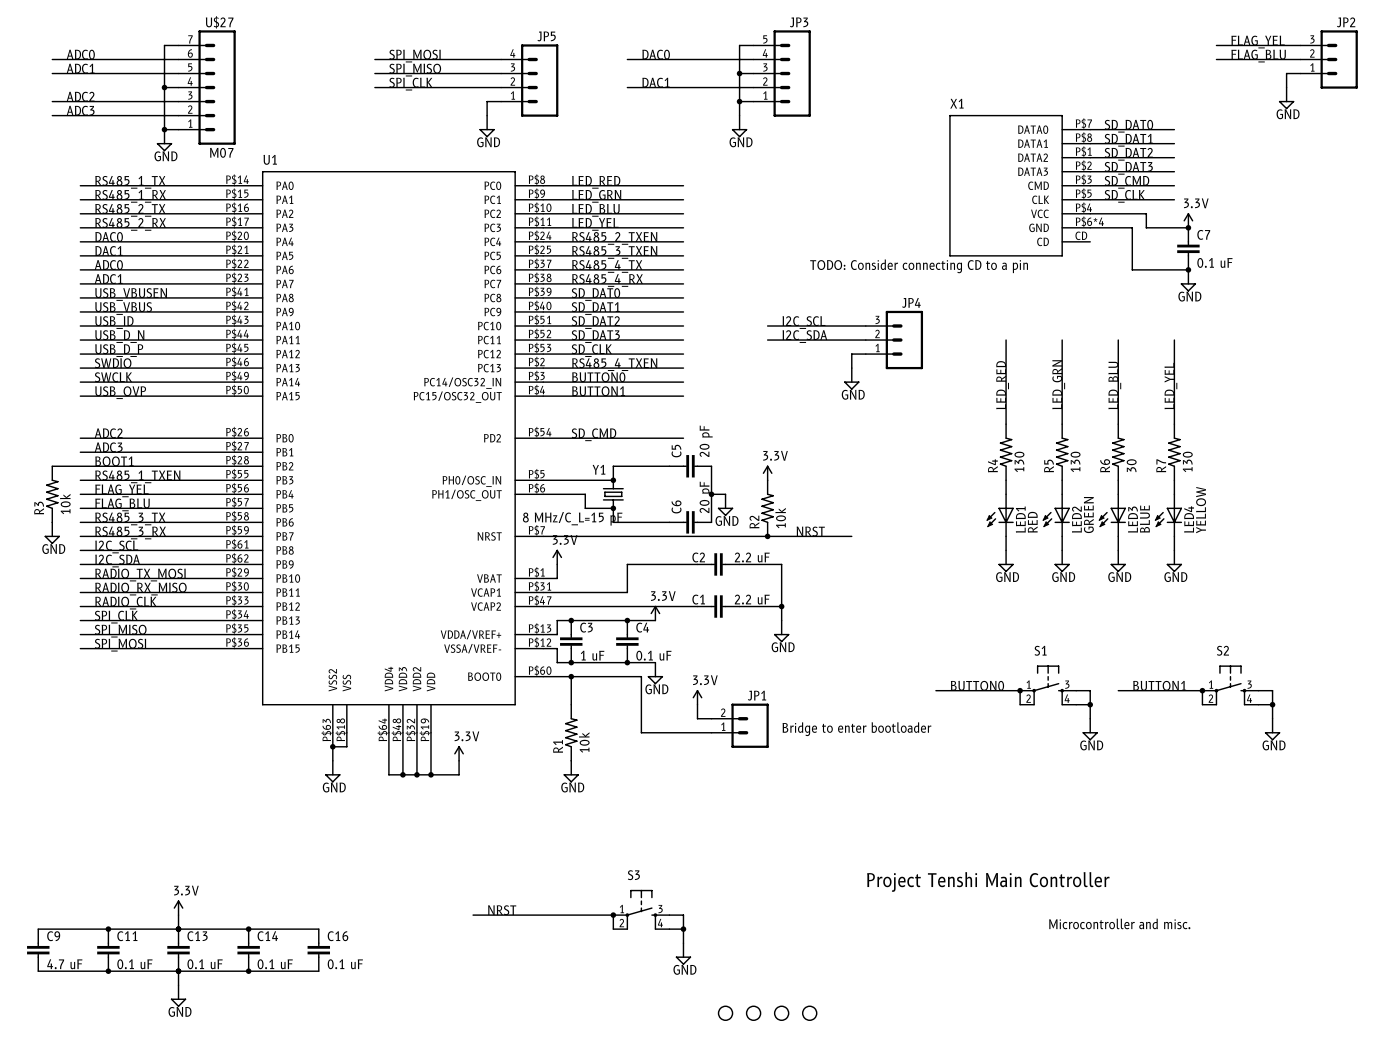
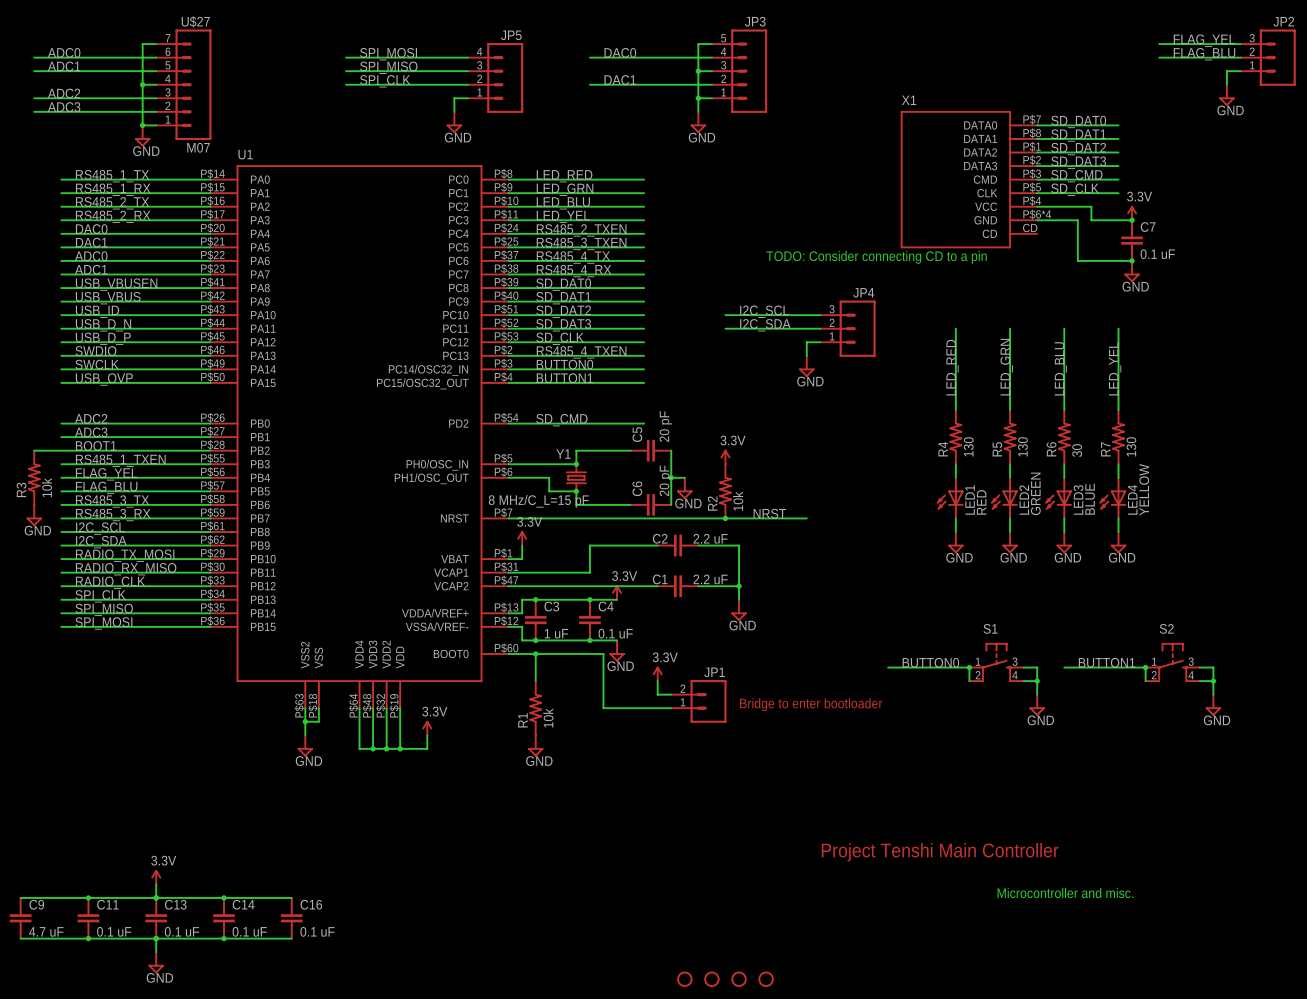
S3: (641, 909) -> none
label: NRST (502, 910) -> none
wire: (473, 915) (613, 915) (613, 929) -> none
junction: (613, 915) -> none
wire: (669, 915) (683, 915) (683, 943) -> none
wire: (669, 929) (683, 929) -> none
junction: (683, 929) -> none
power symbol: GND (683, 954) -> none

